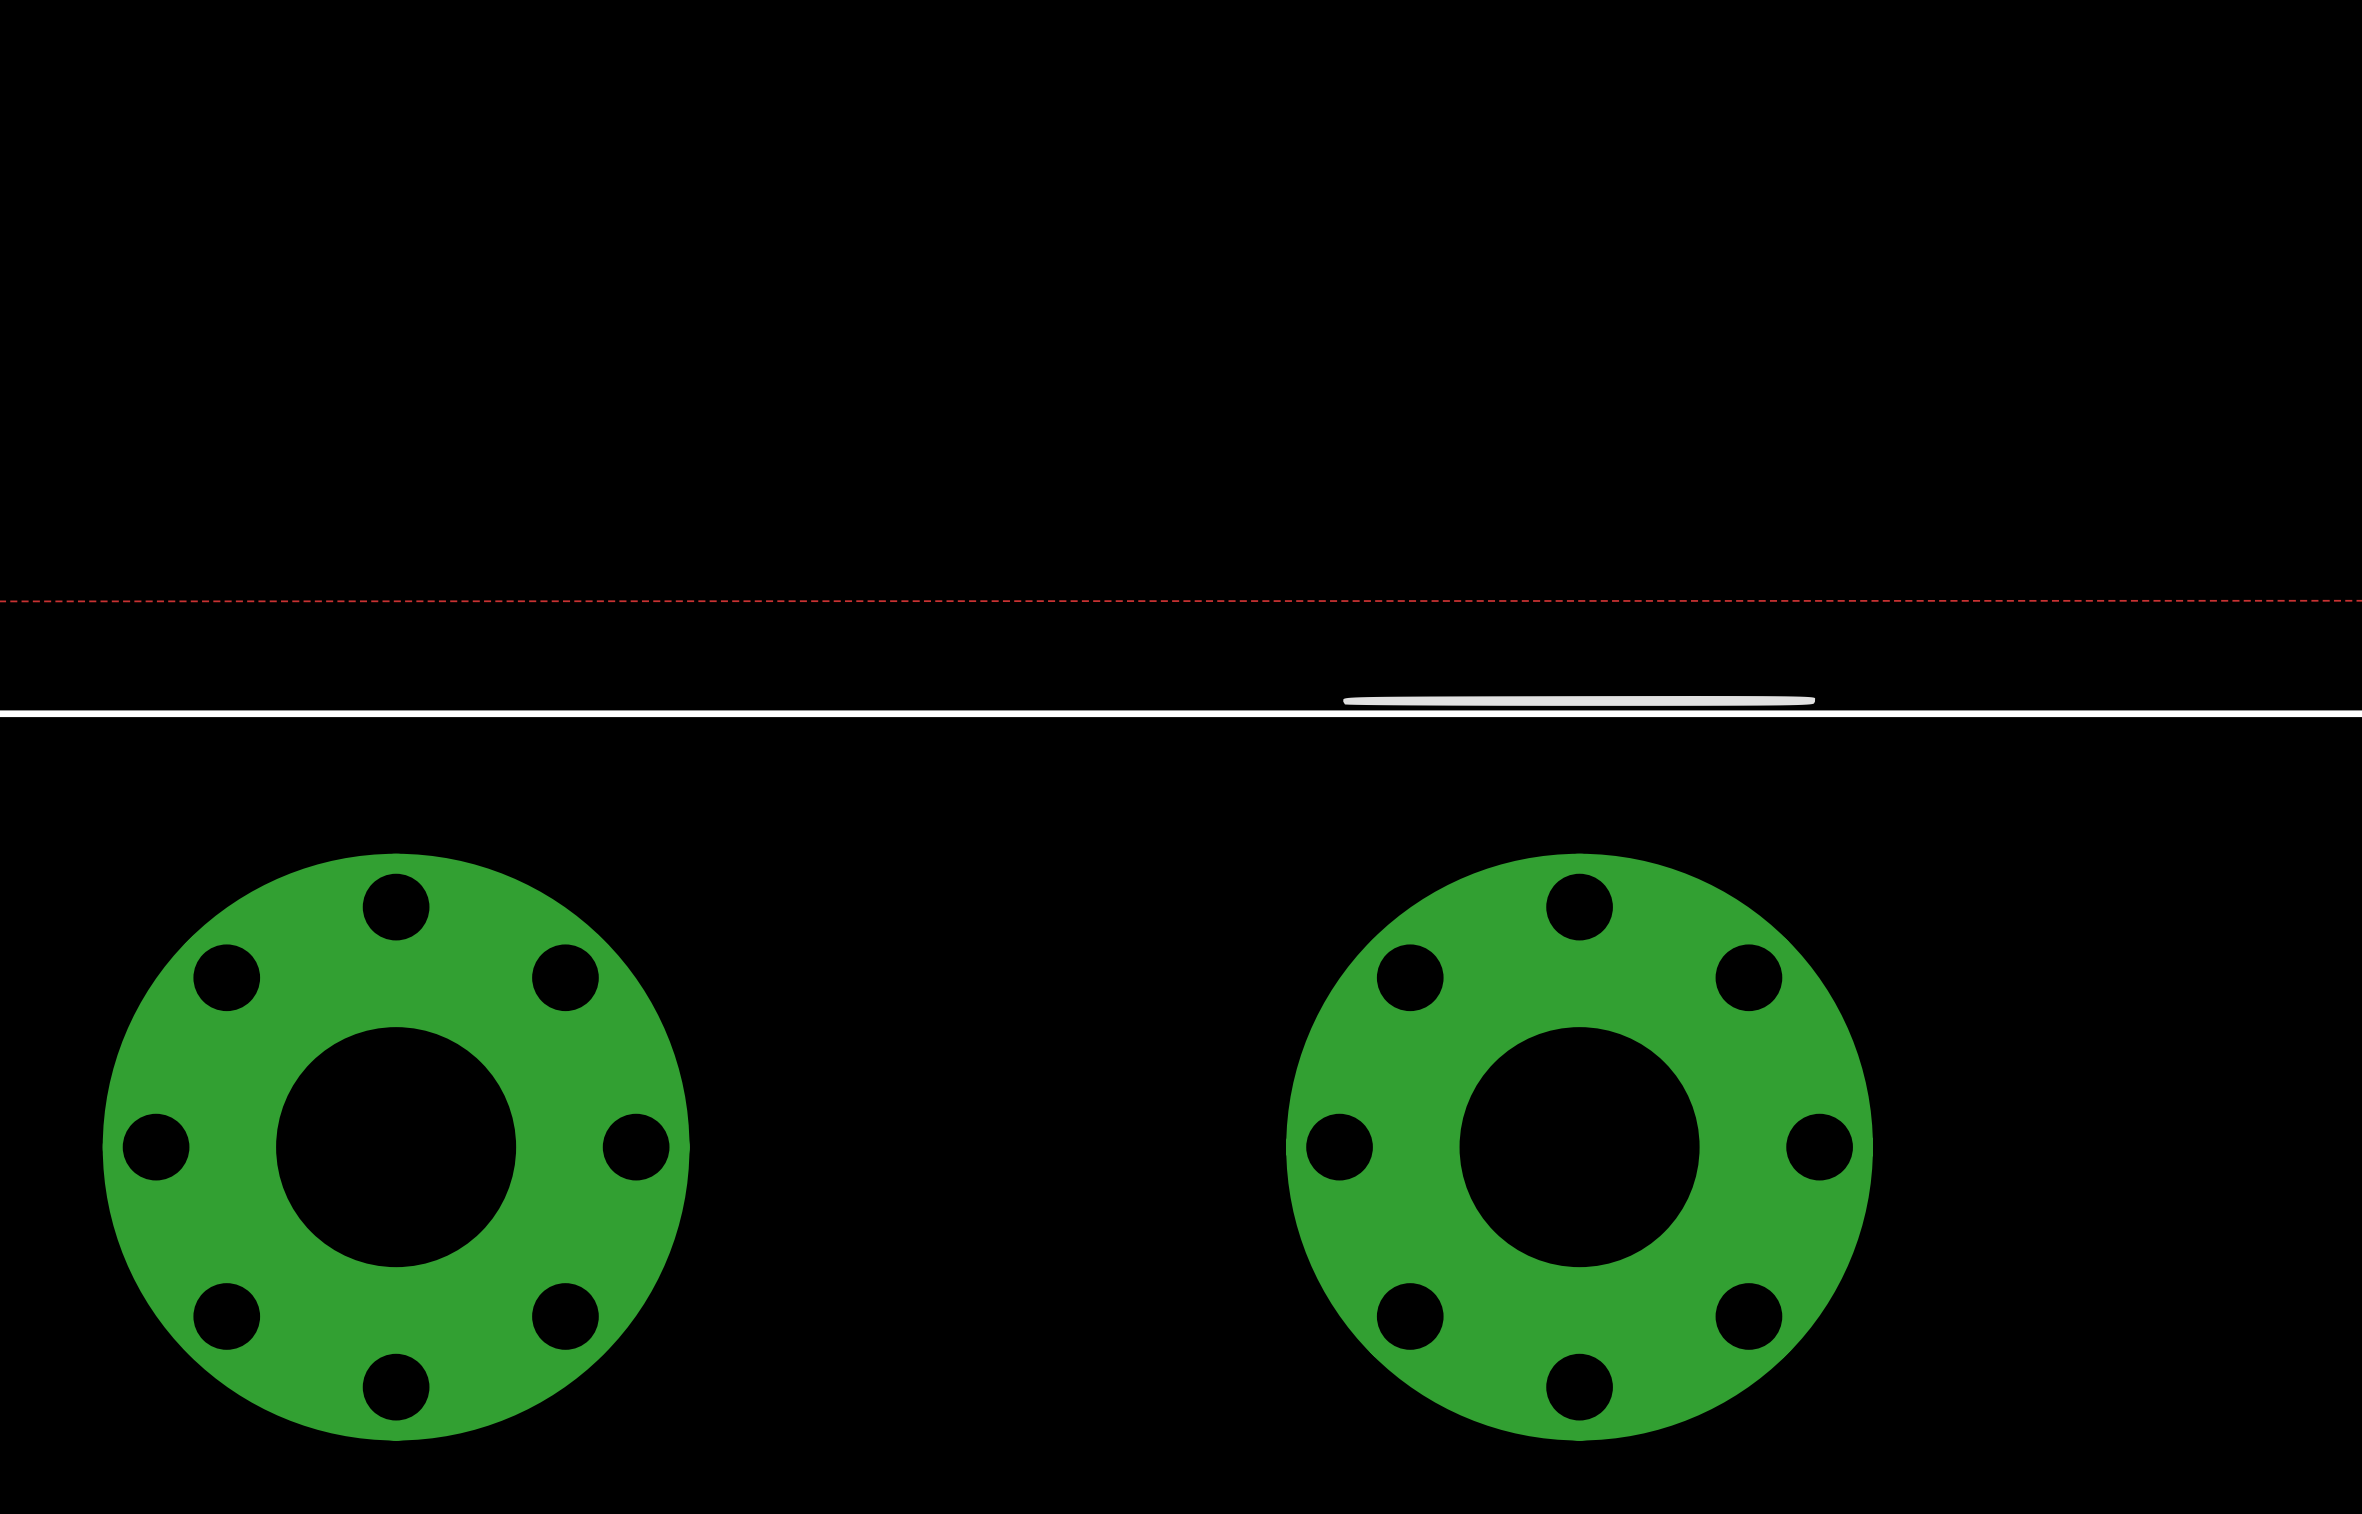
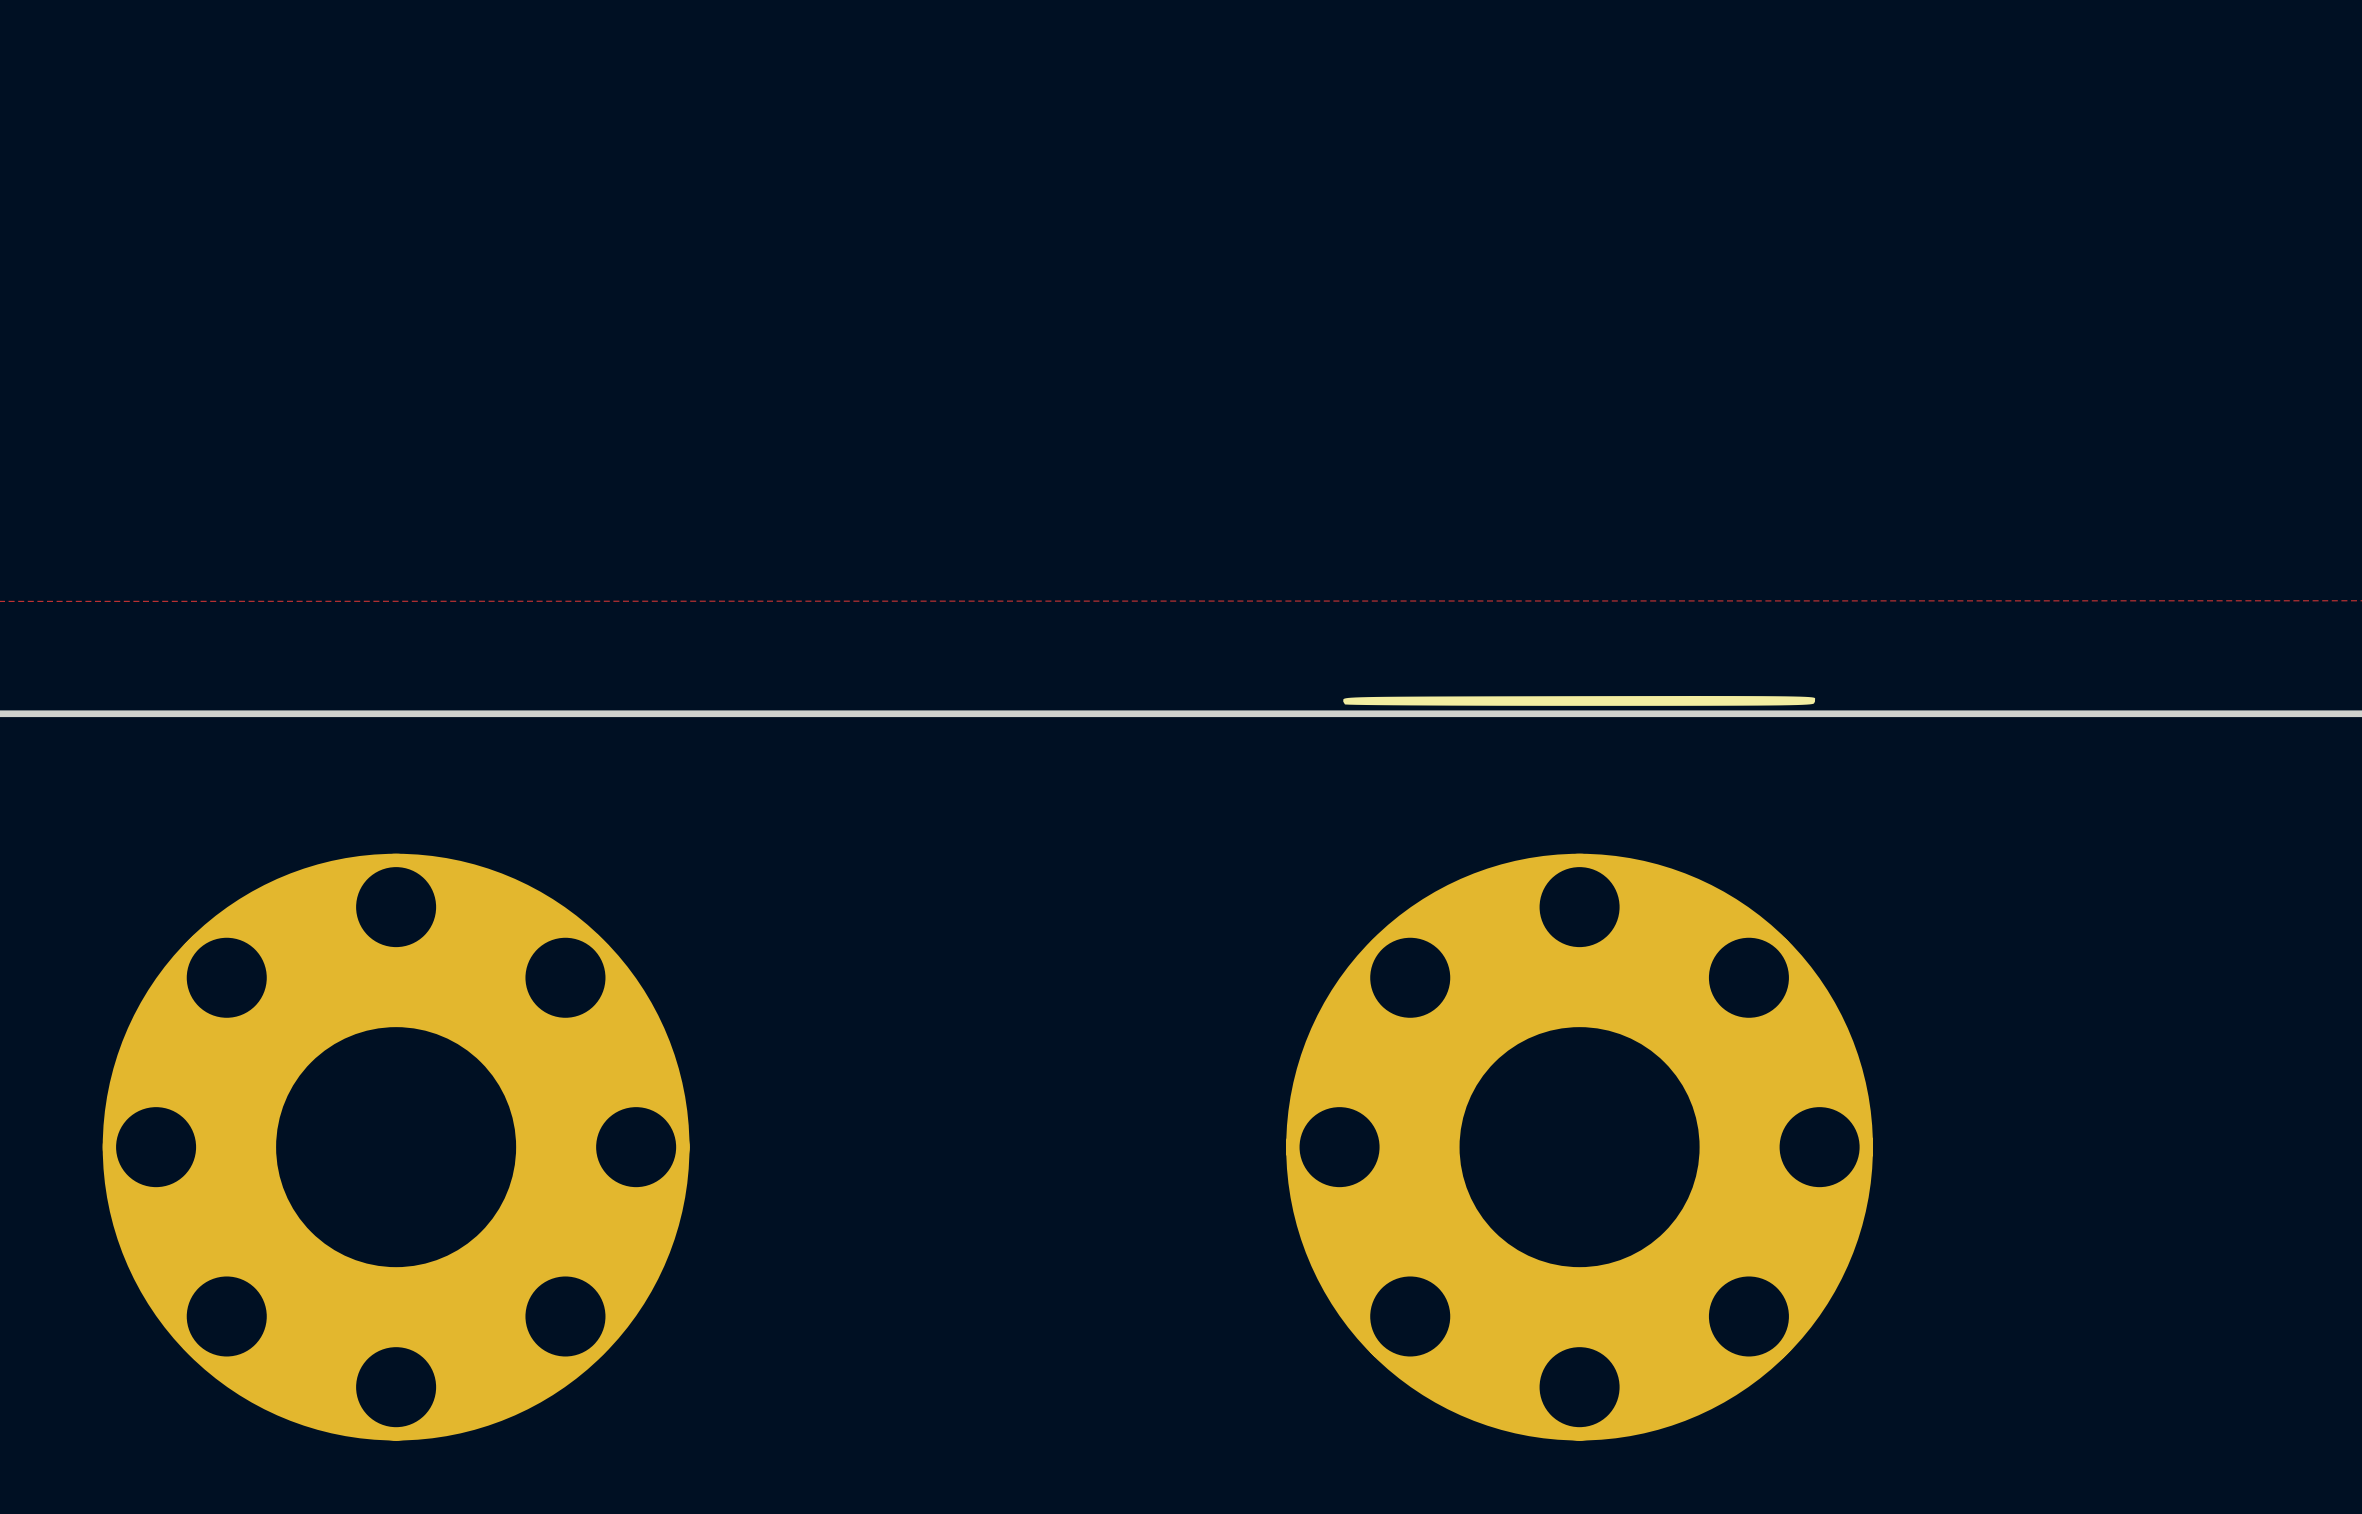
part footprint: [102, 853, 690, 1441] -> [102, 853, 690, 1441]
part footprint: [1286, 853, 1873, 1441] -> [1286, 853, 1873, 1441]

